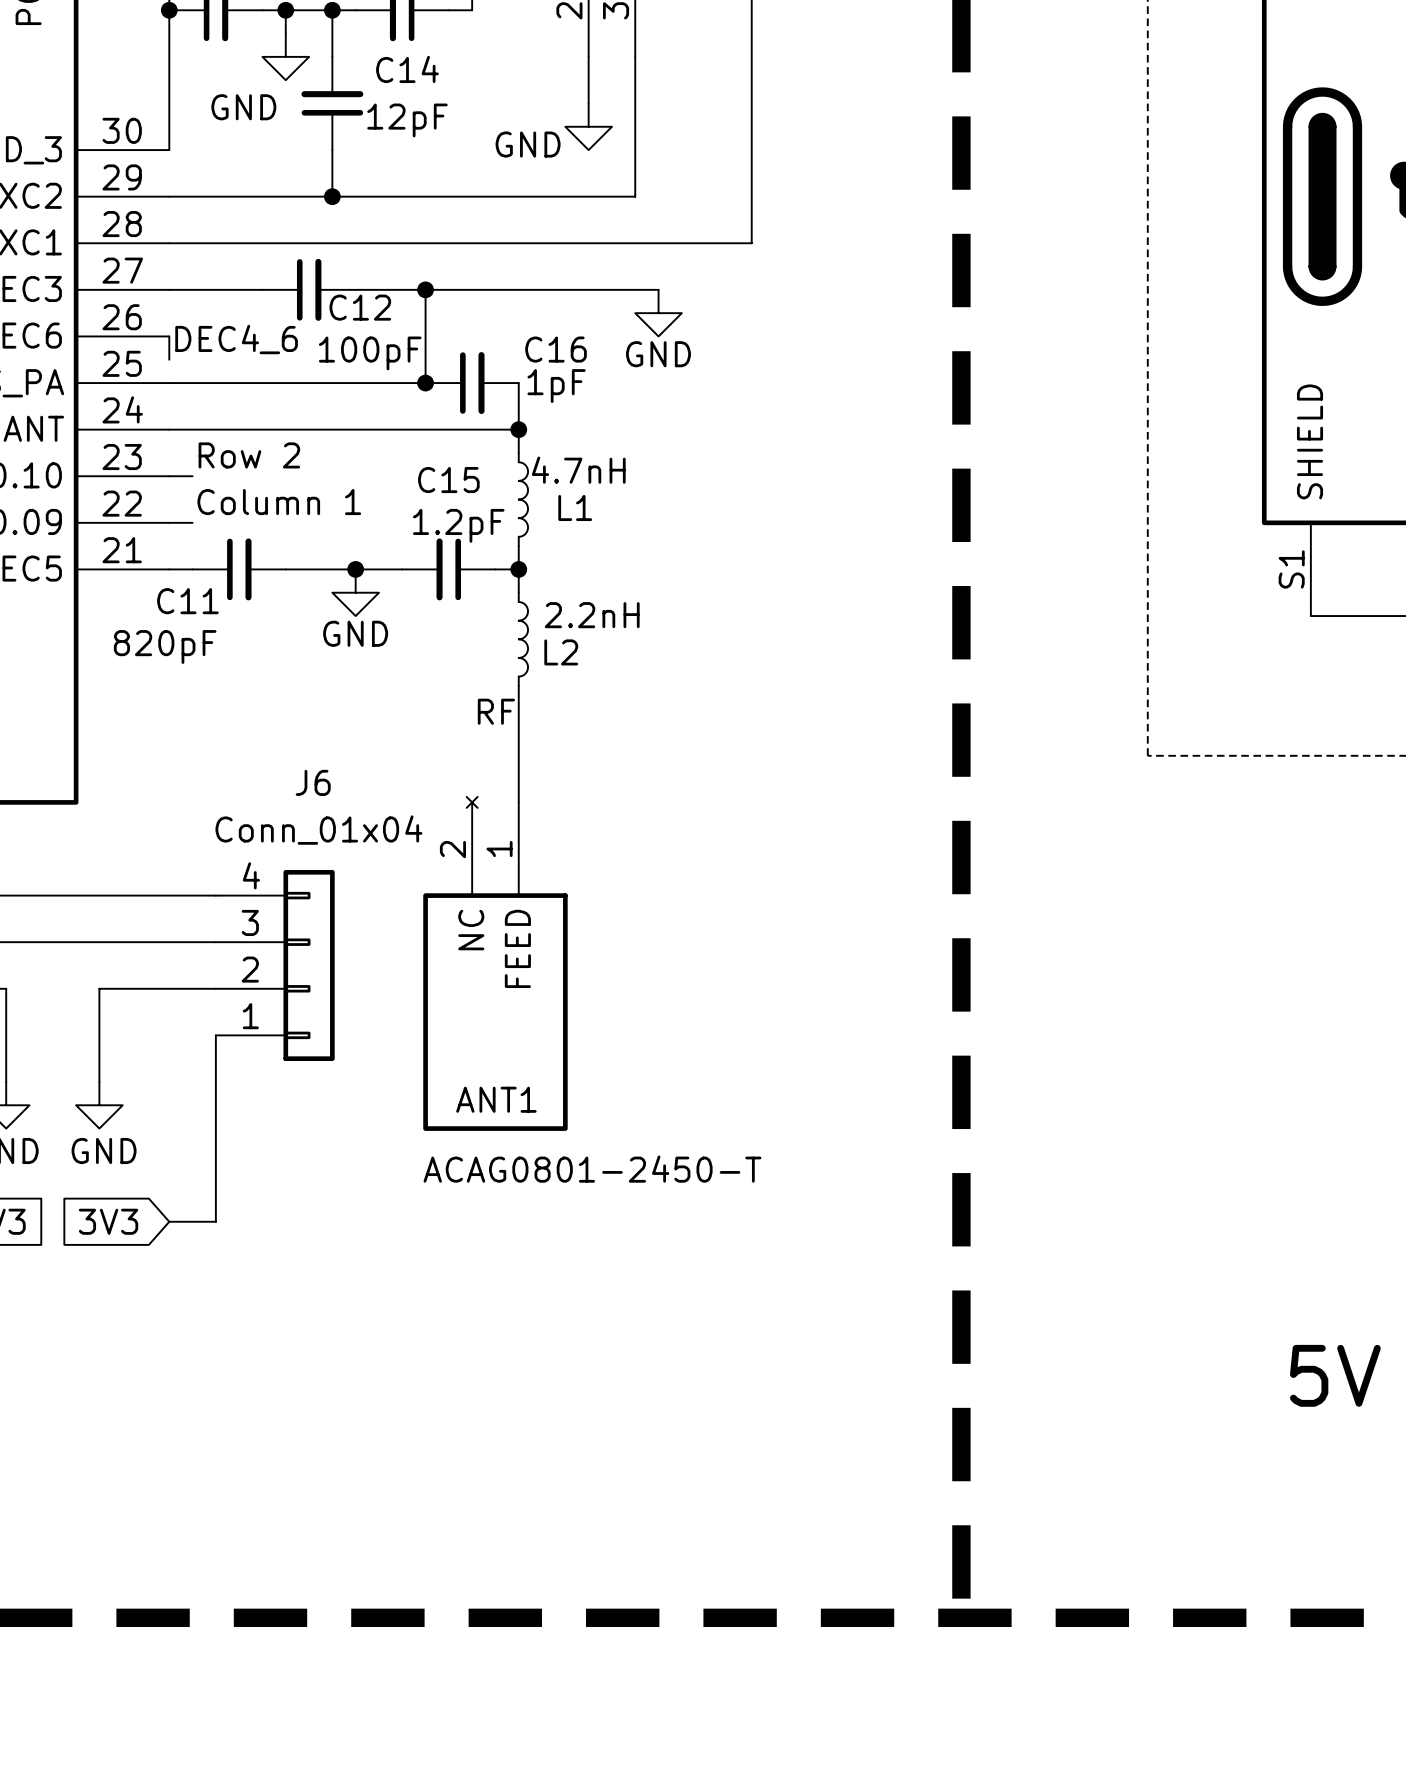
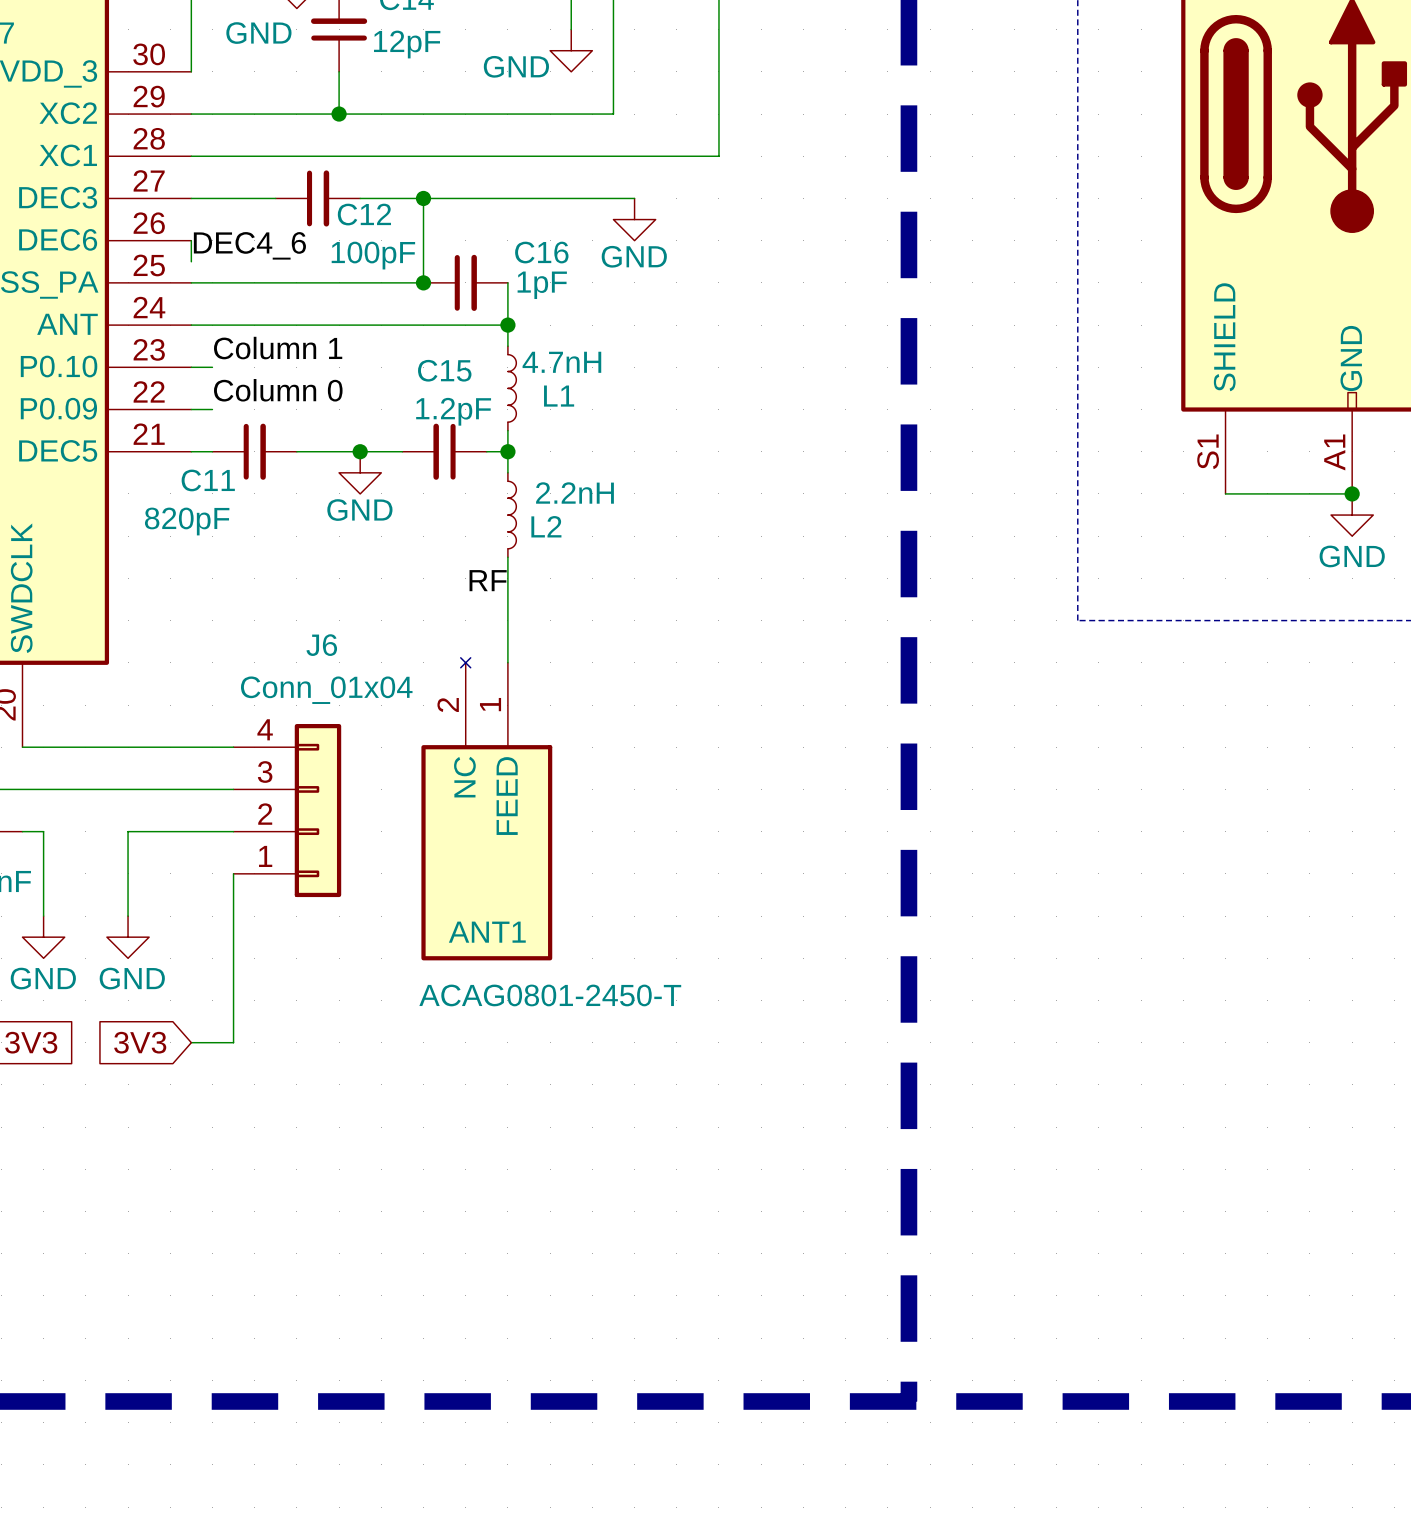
label: Row 2 (249, 455) -> Column 1 (278, 348)
label: Column 1 (279, 502) -> Column 0 (278, 390)

